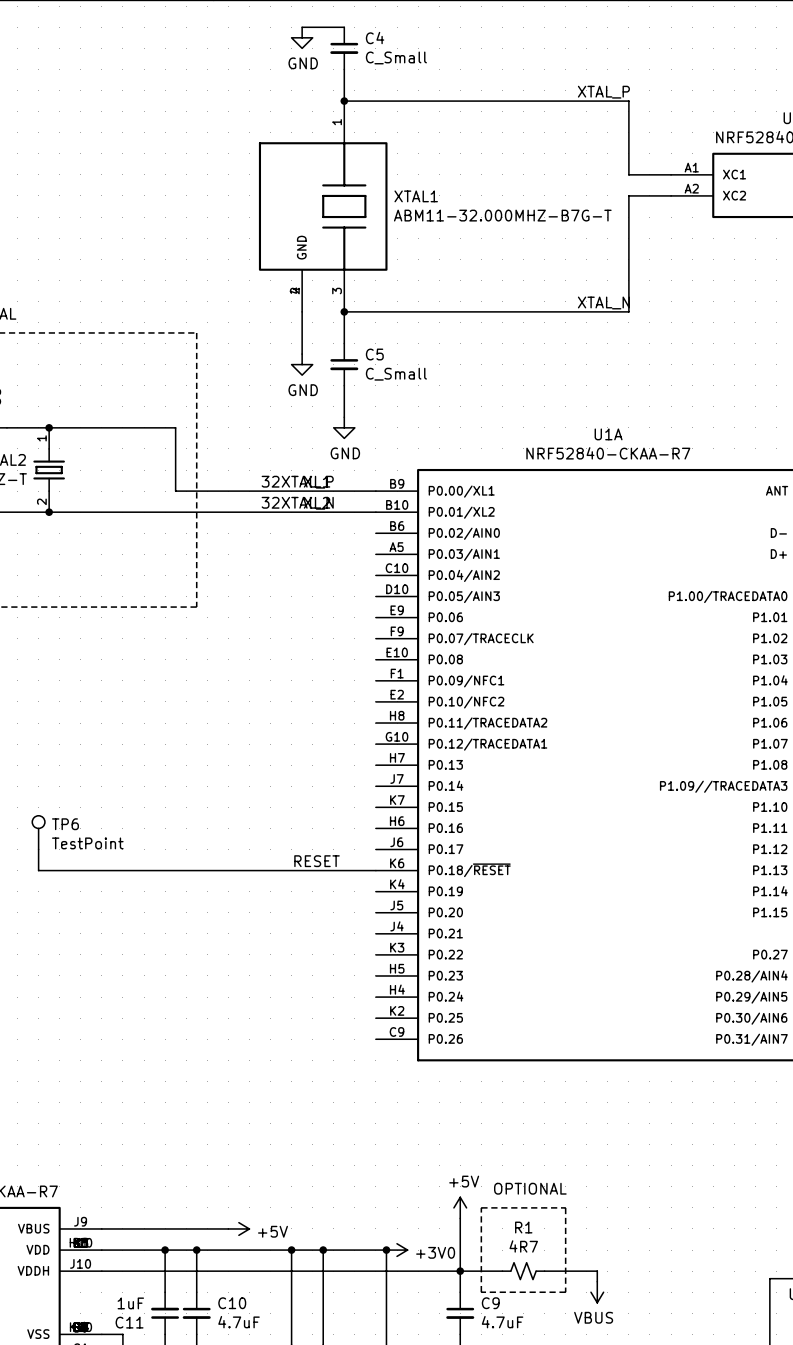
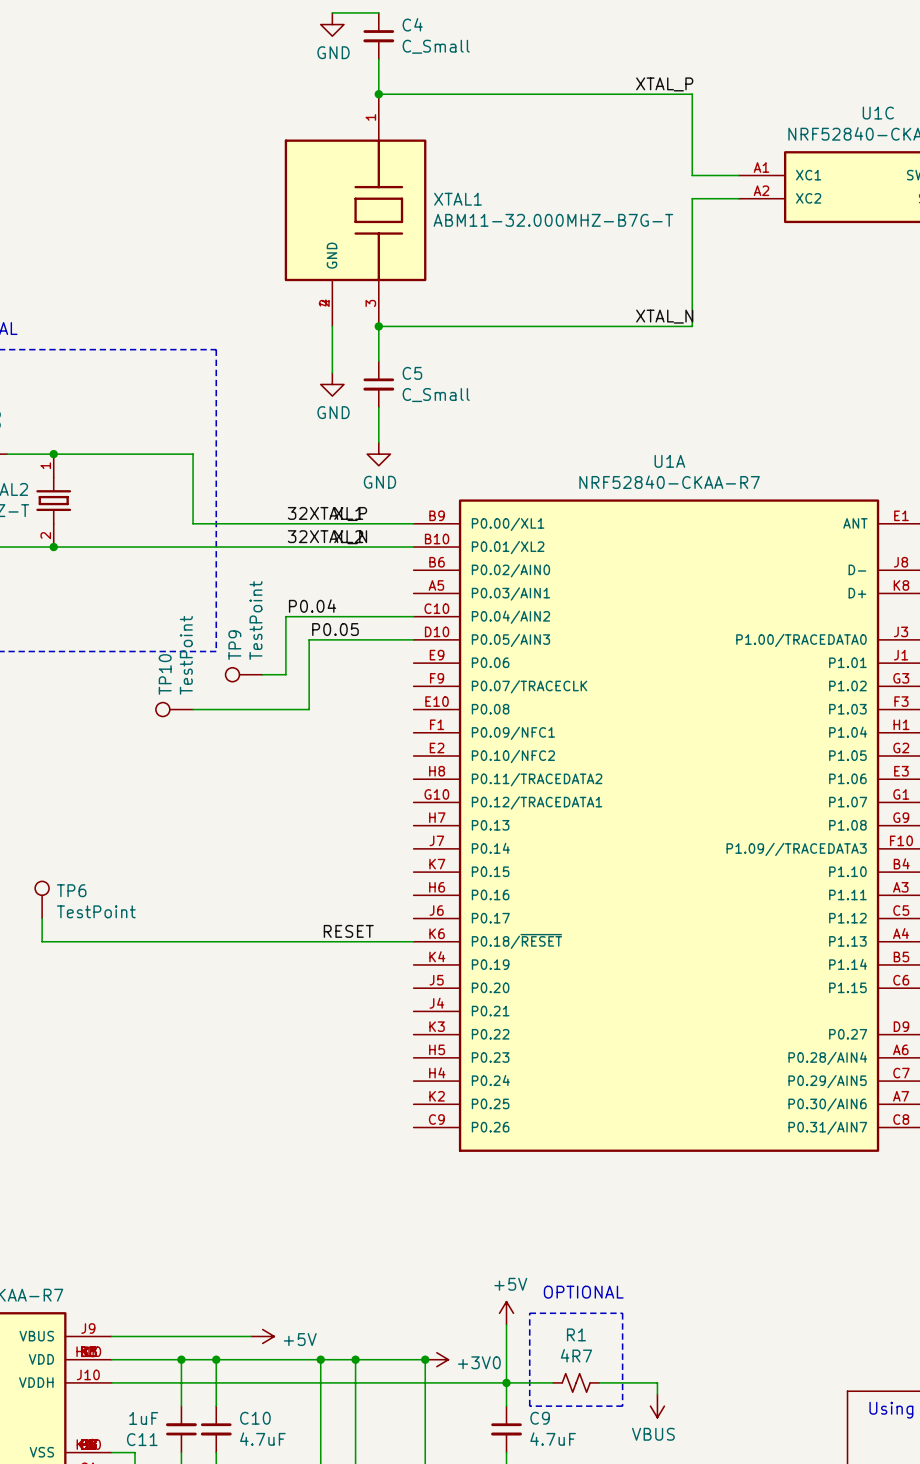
label: none -> P0.04 (312, 606)
wire: none -> (413, 616) (285, 616) (285, 674) (262, 674)
label: none -> P0.05 (335, 629)
wire: none -> (413, 639) (309, 639) (309, 709) (193, 709)
TP9: none -> TestPoint (244, 674)
TP10: none -> TestPoint (174, 709)

